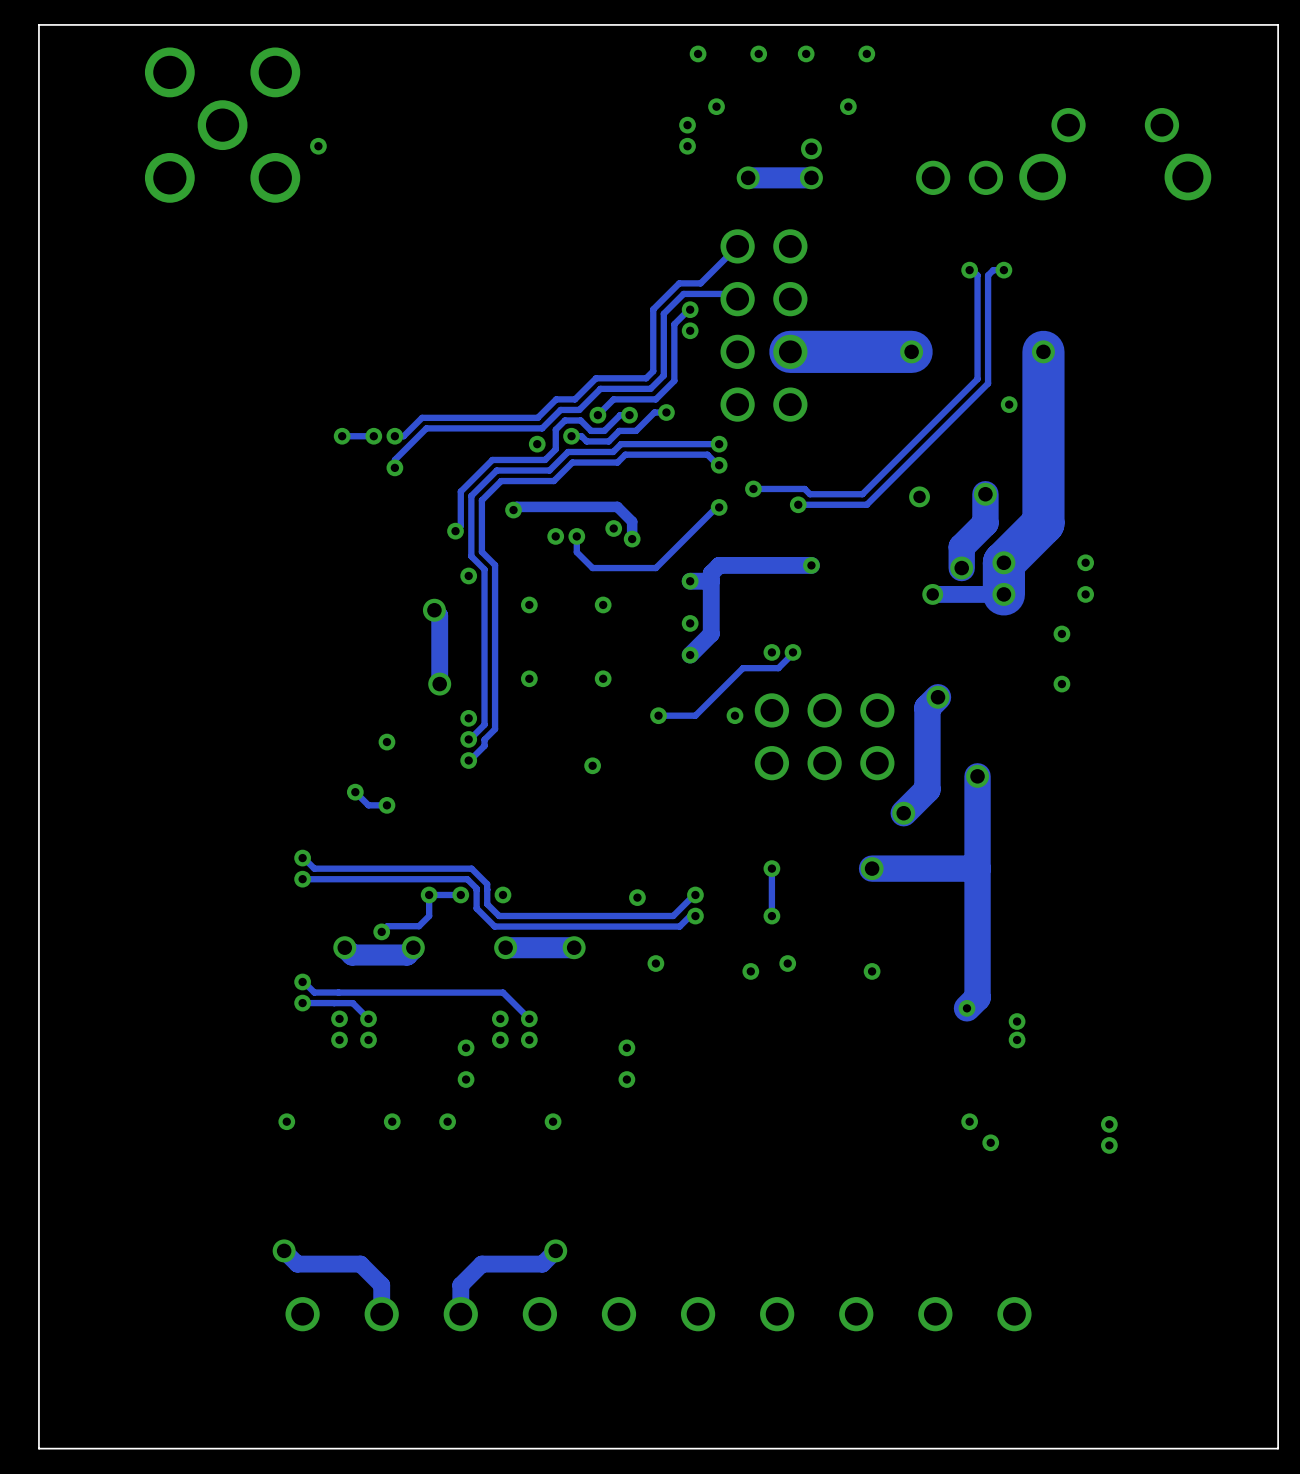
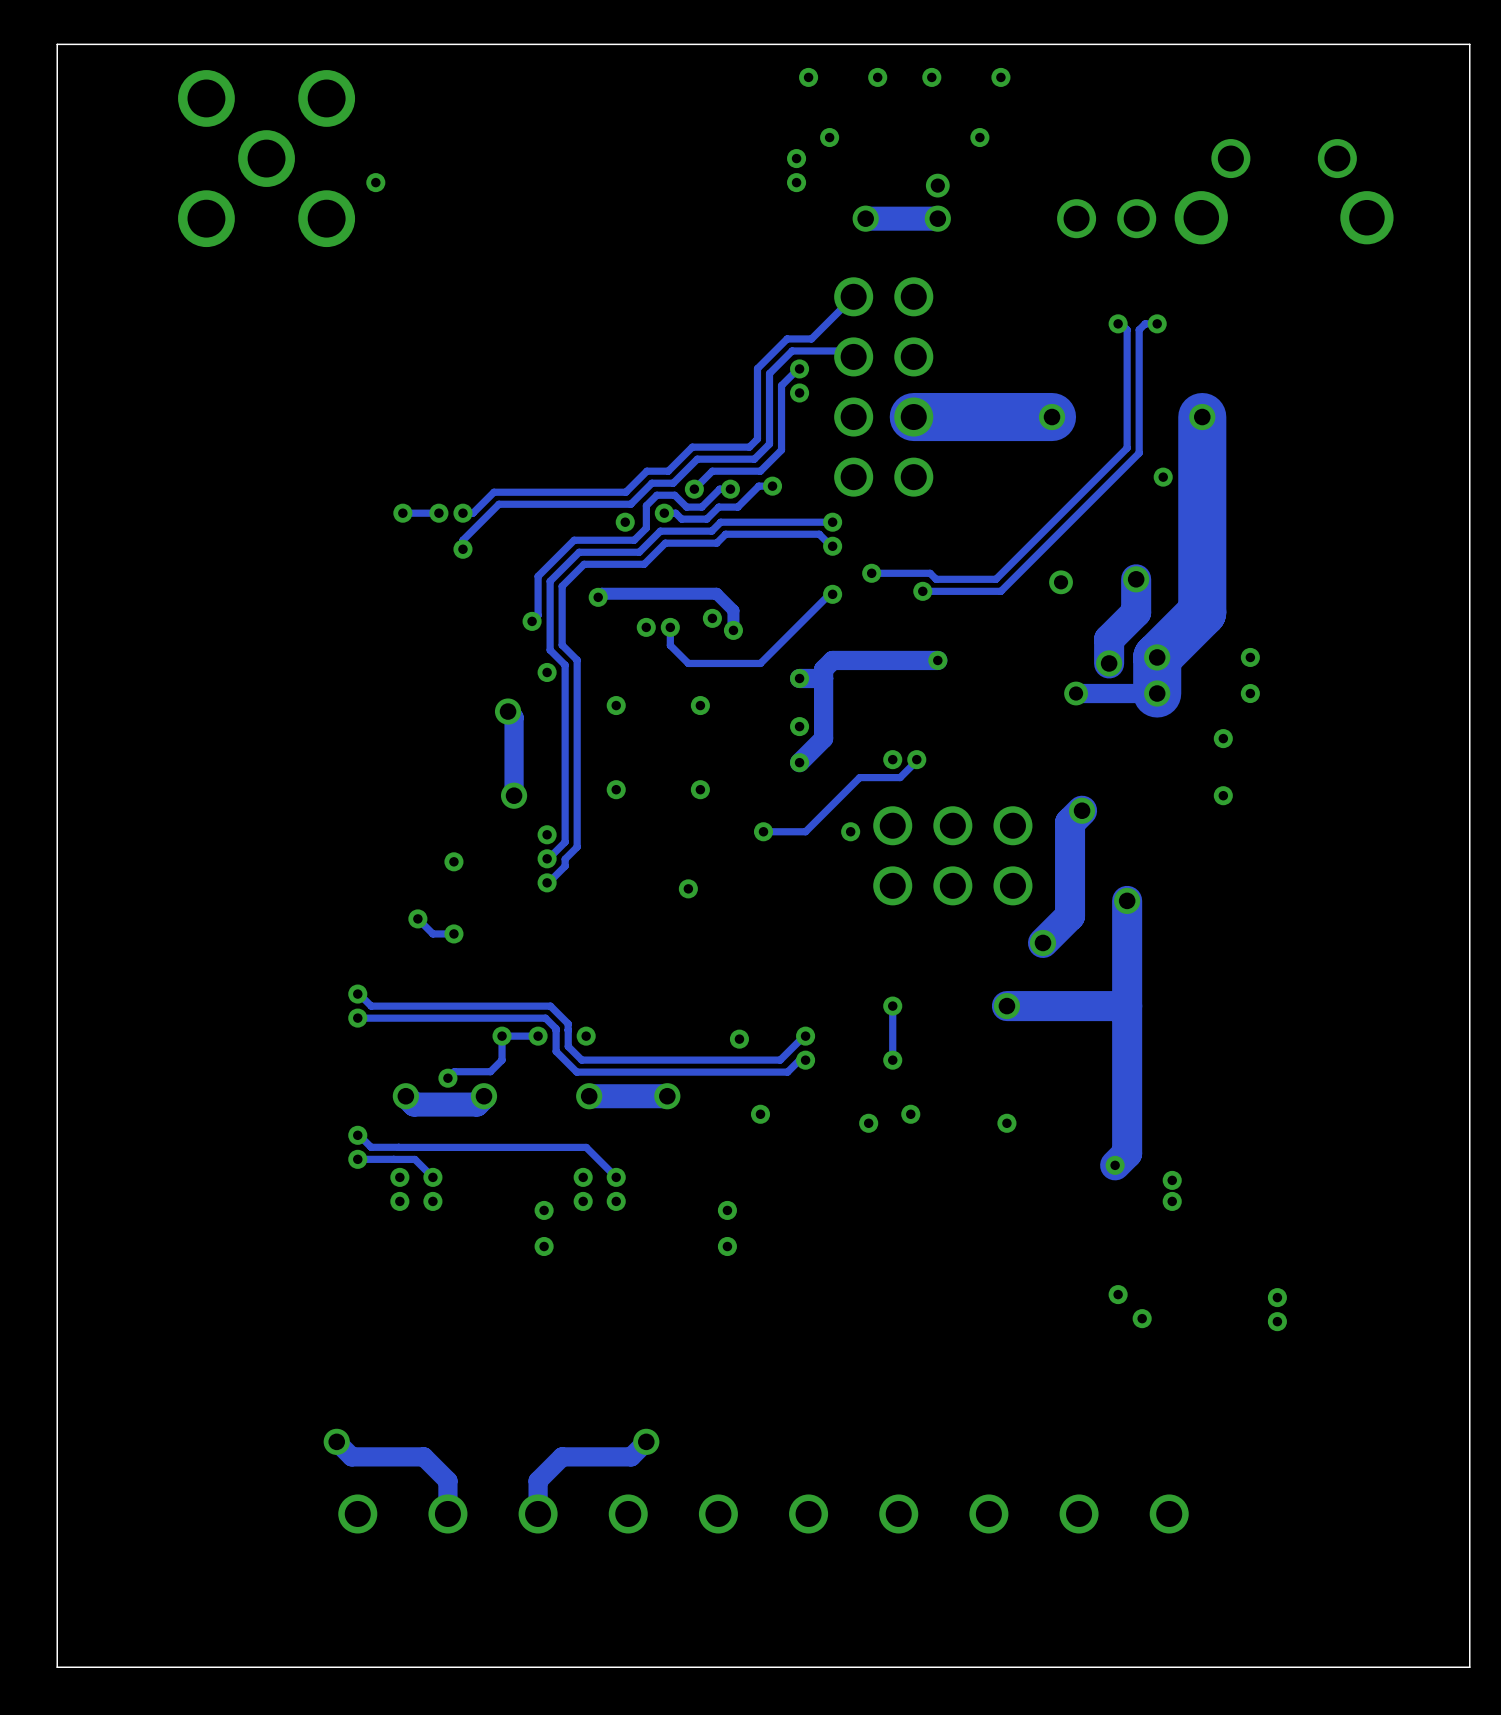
via: (286, 1121) -> none
via: (392, 1121) -> none
via: (447, 1121) -> none
via: (553, 1121) -> none

